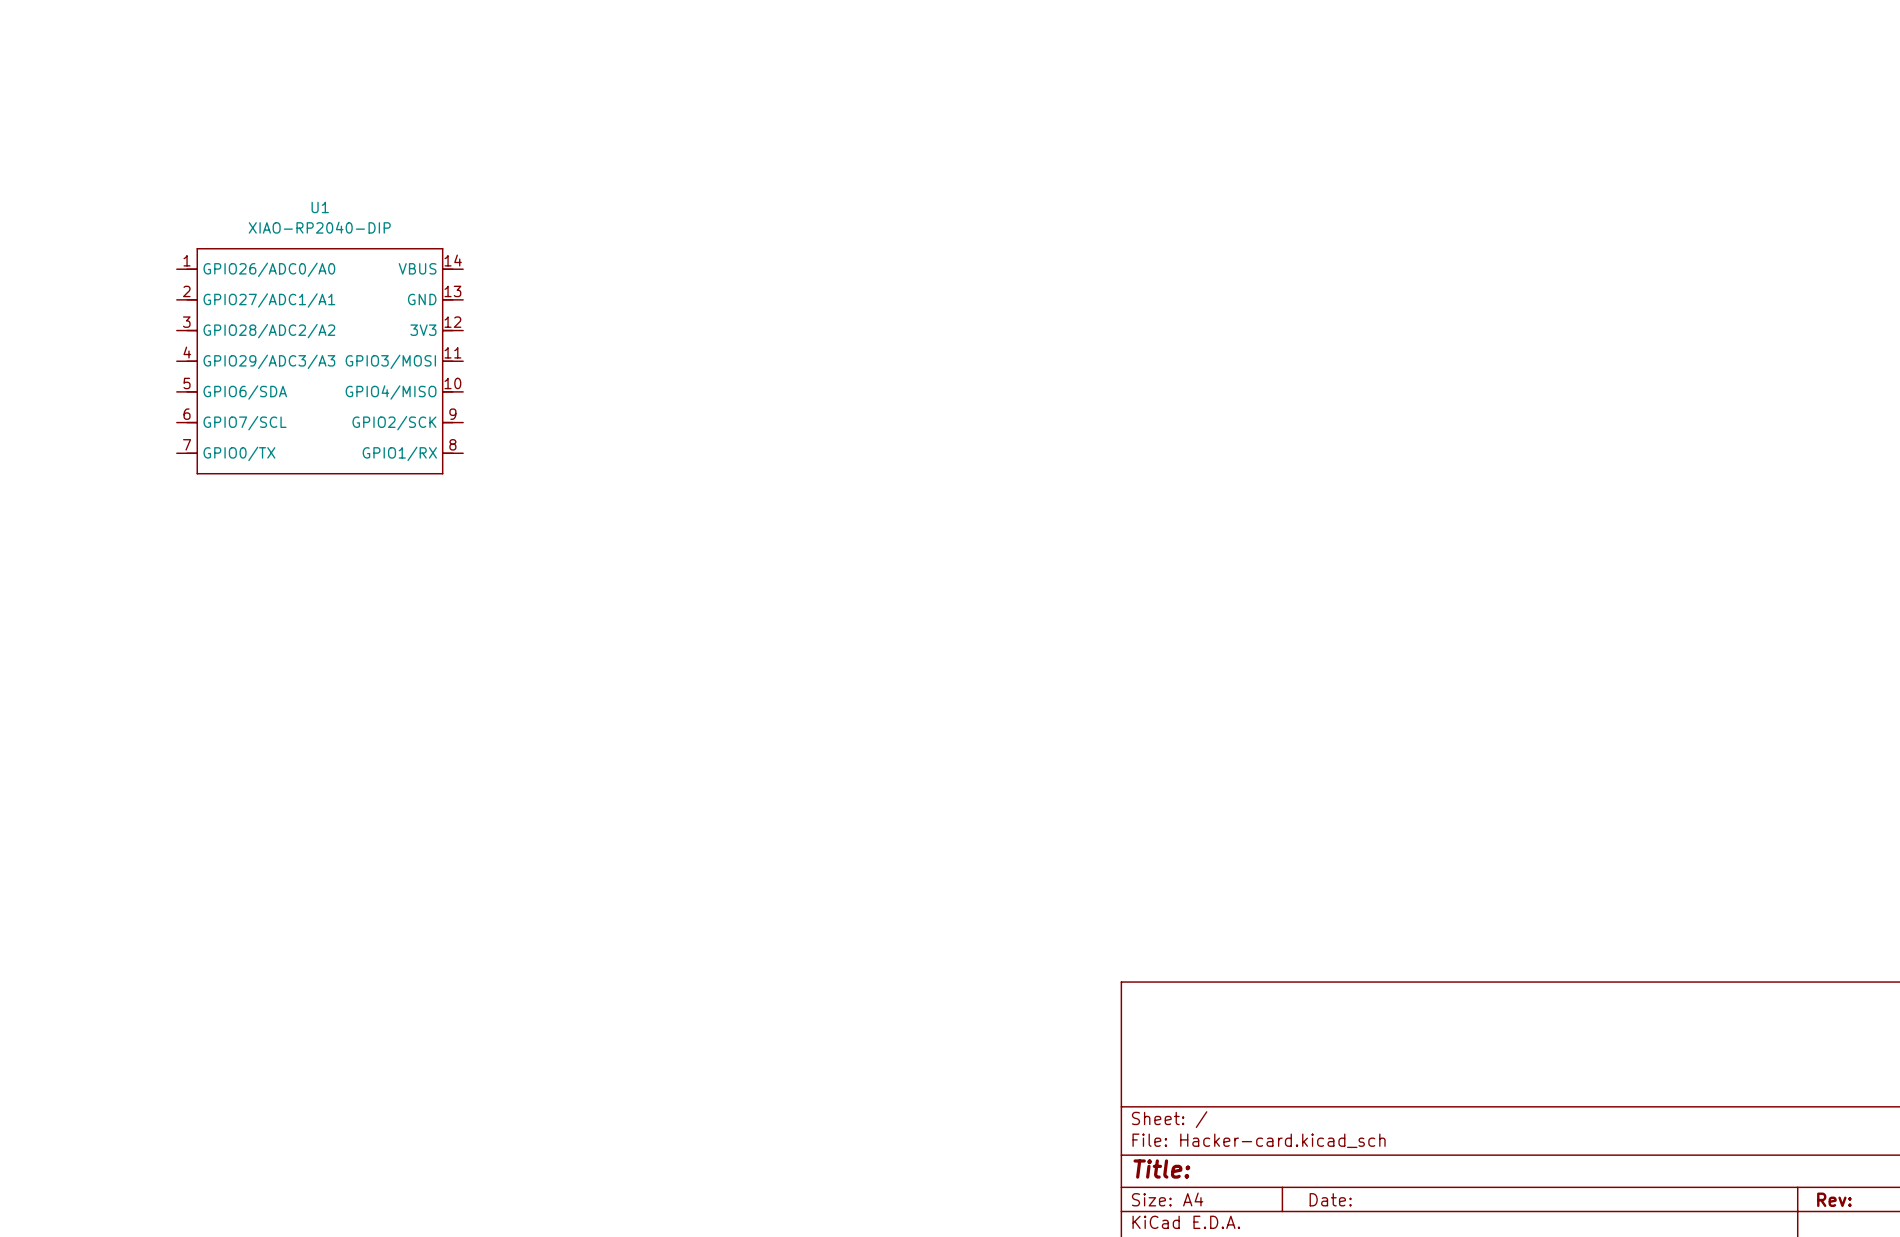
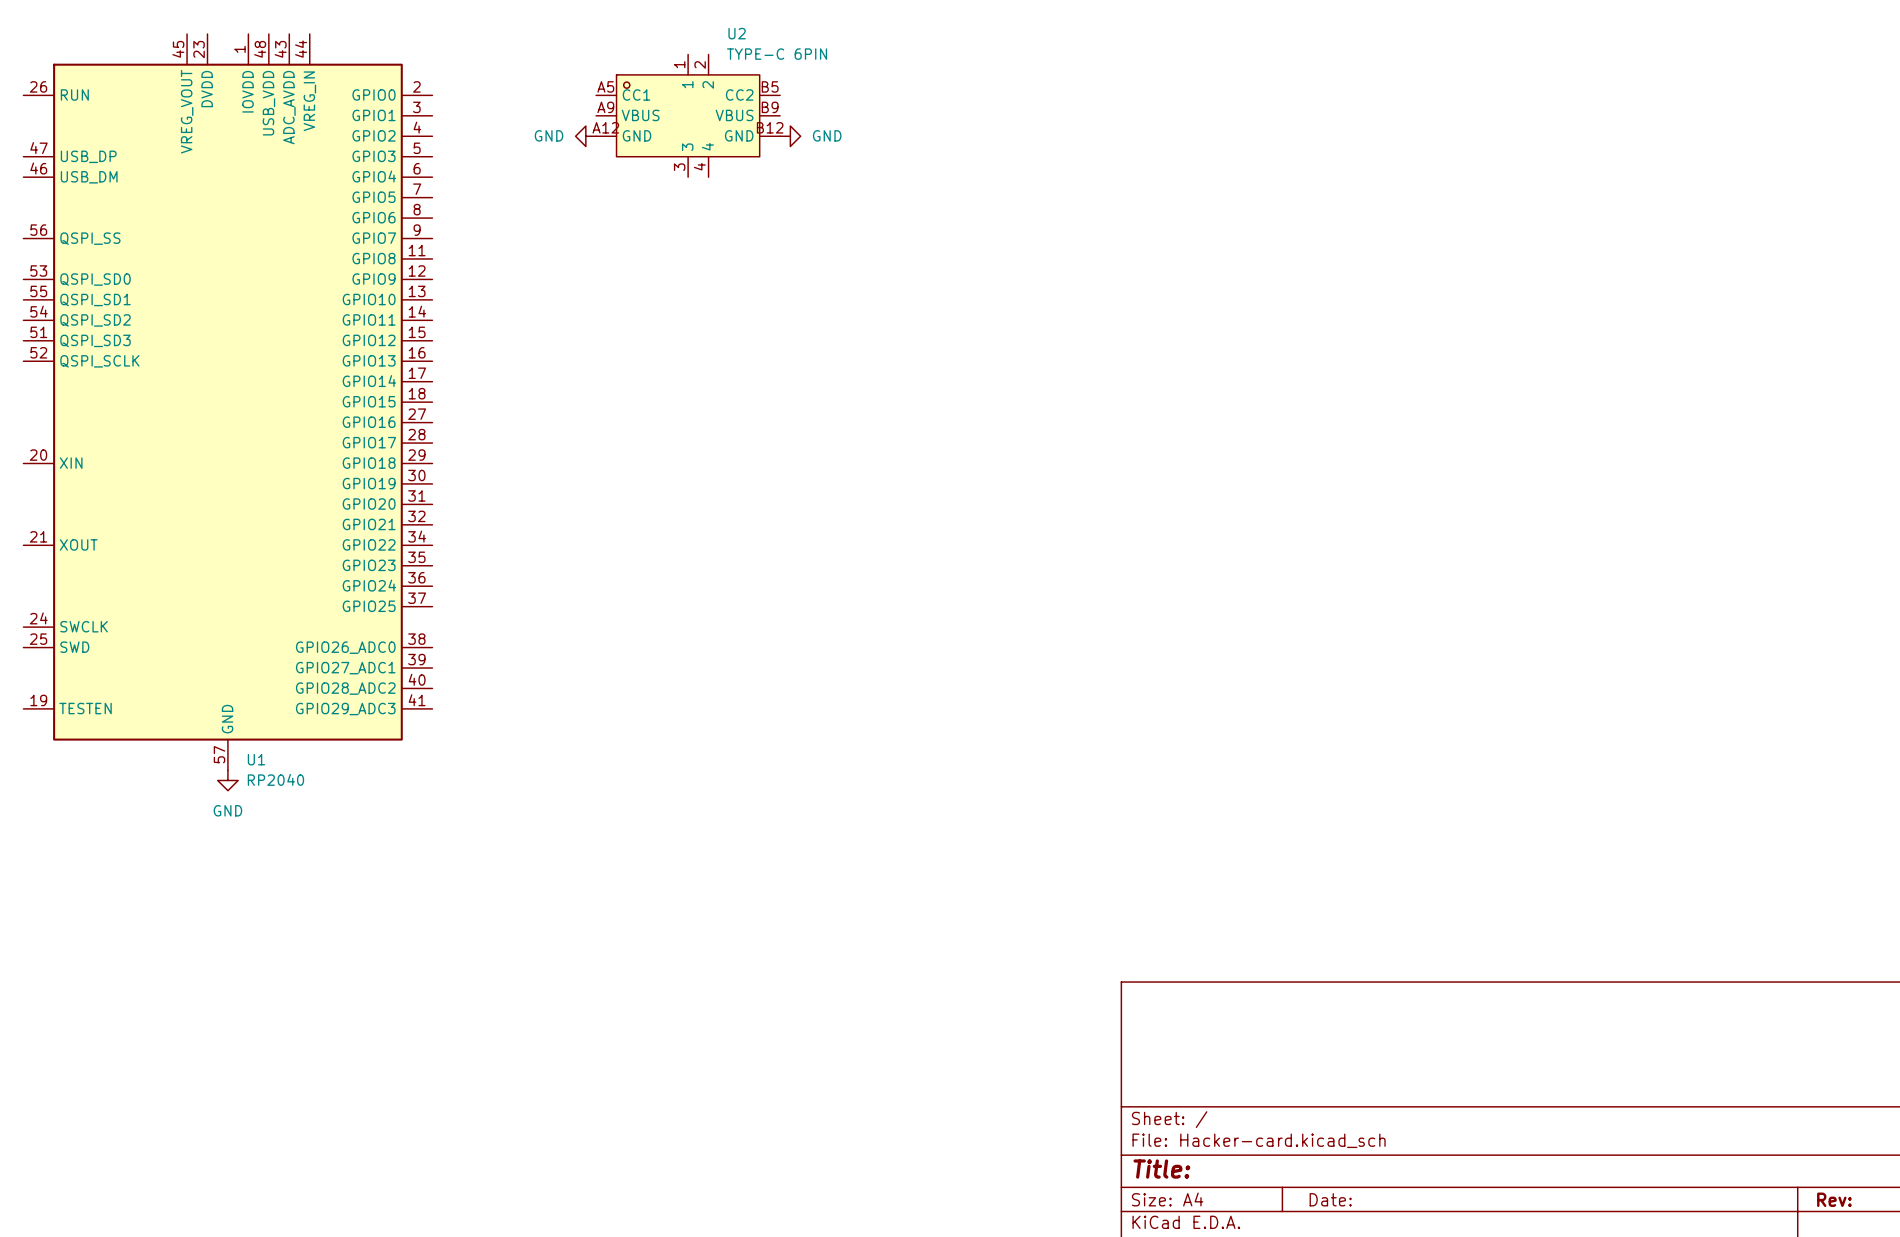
U2: none -> TYPE-C 6PIN (688, 115)
power symbol: none -> GND (585, 136)
power symbol: none -> GND (790, 136)
U1 name position: U1 (320, 207) -> U1 (256, 759)
U1 value: XIAO-RP2040-DIP (319, 227) -> RP2040 (275, 779)
U1 symbol: [176, 248, 464, 475] -> [23, 34, 433, 771]
power symbol: none -> GND (227, 780)

